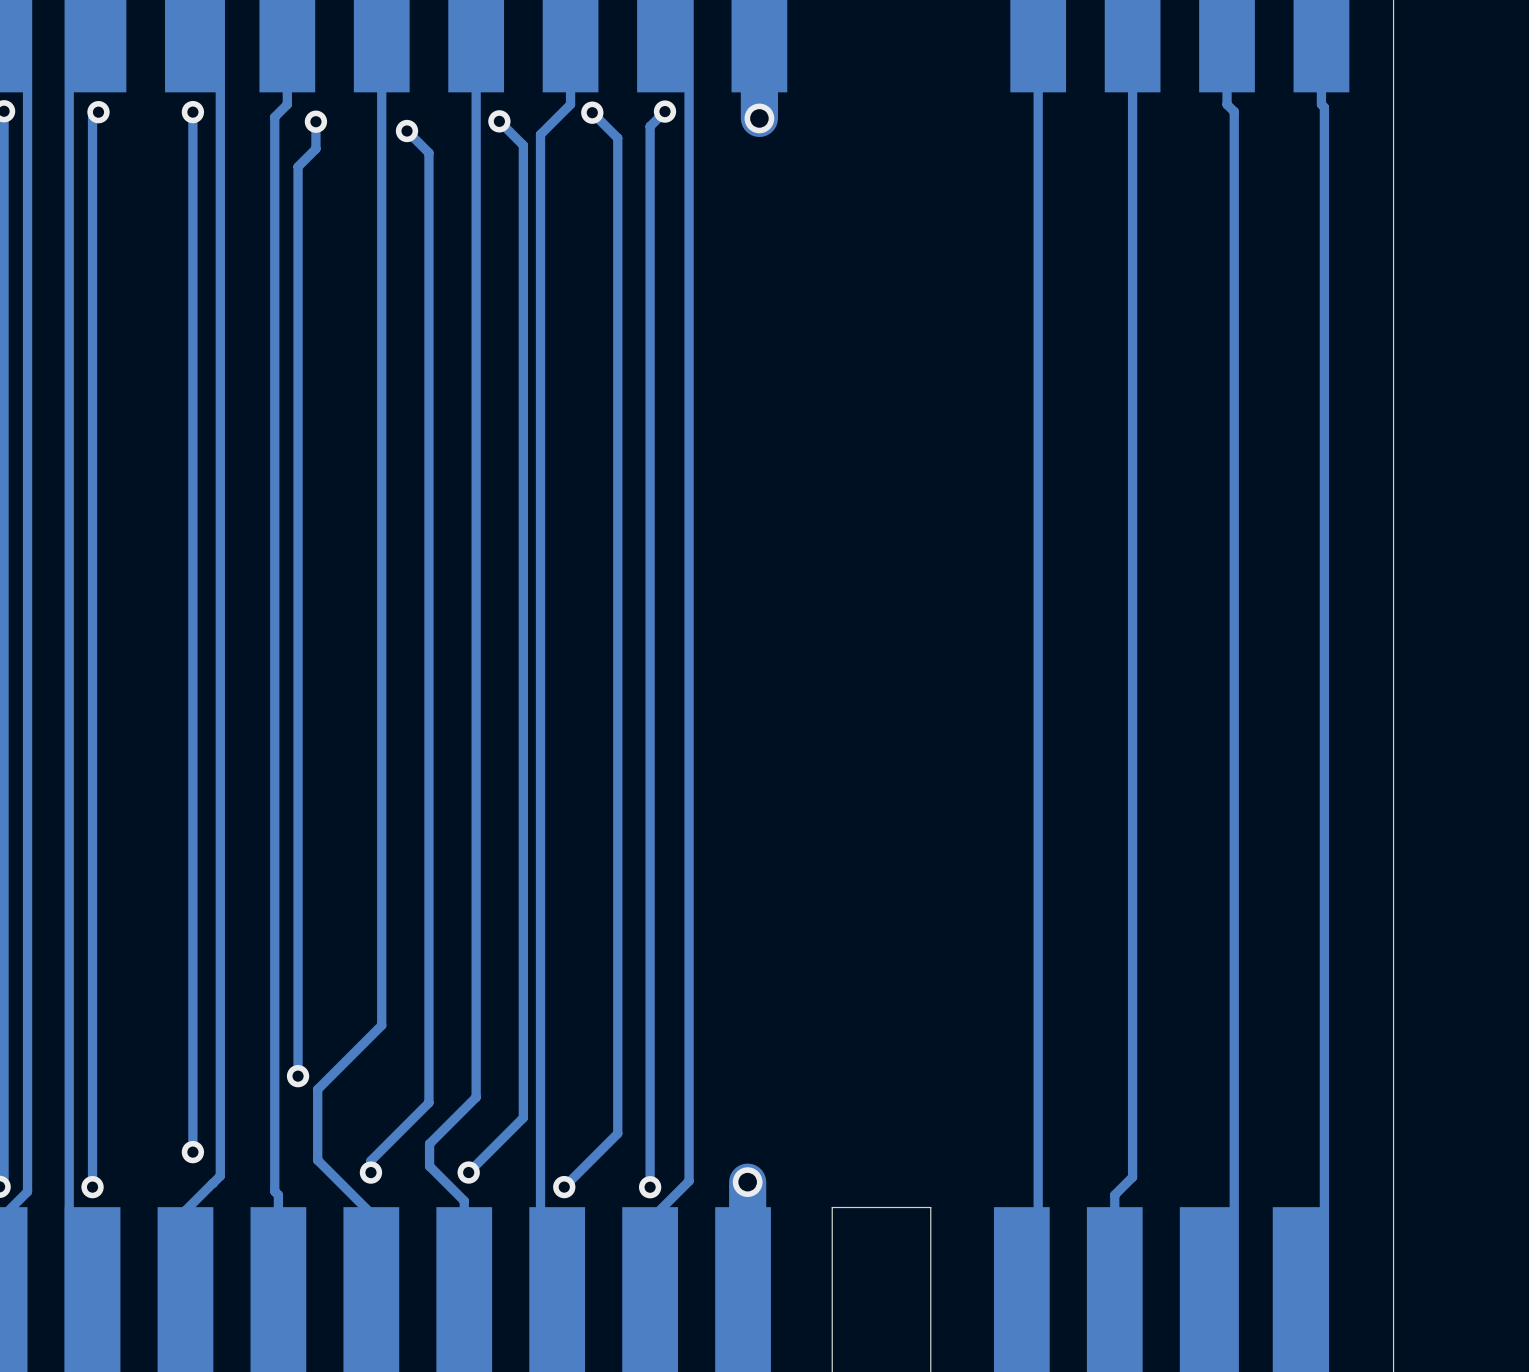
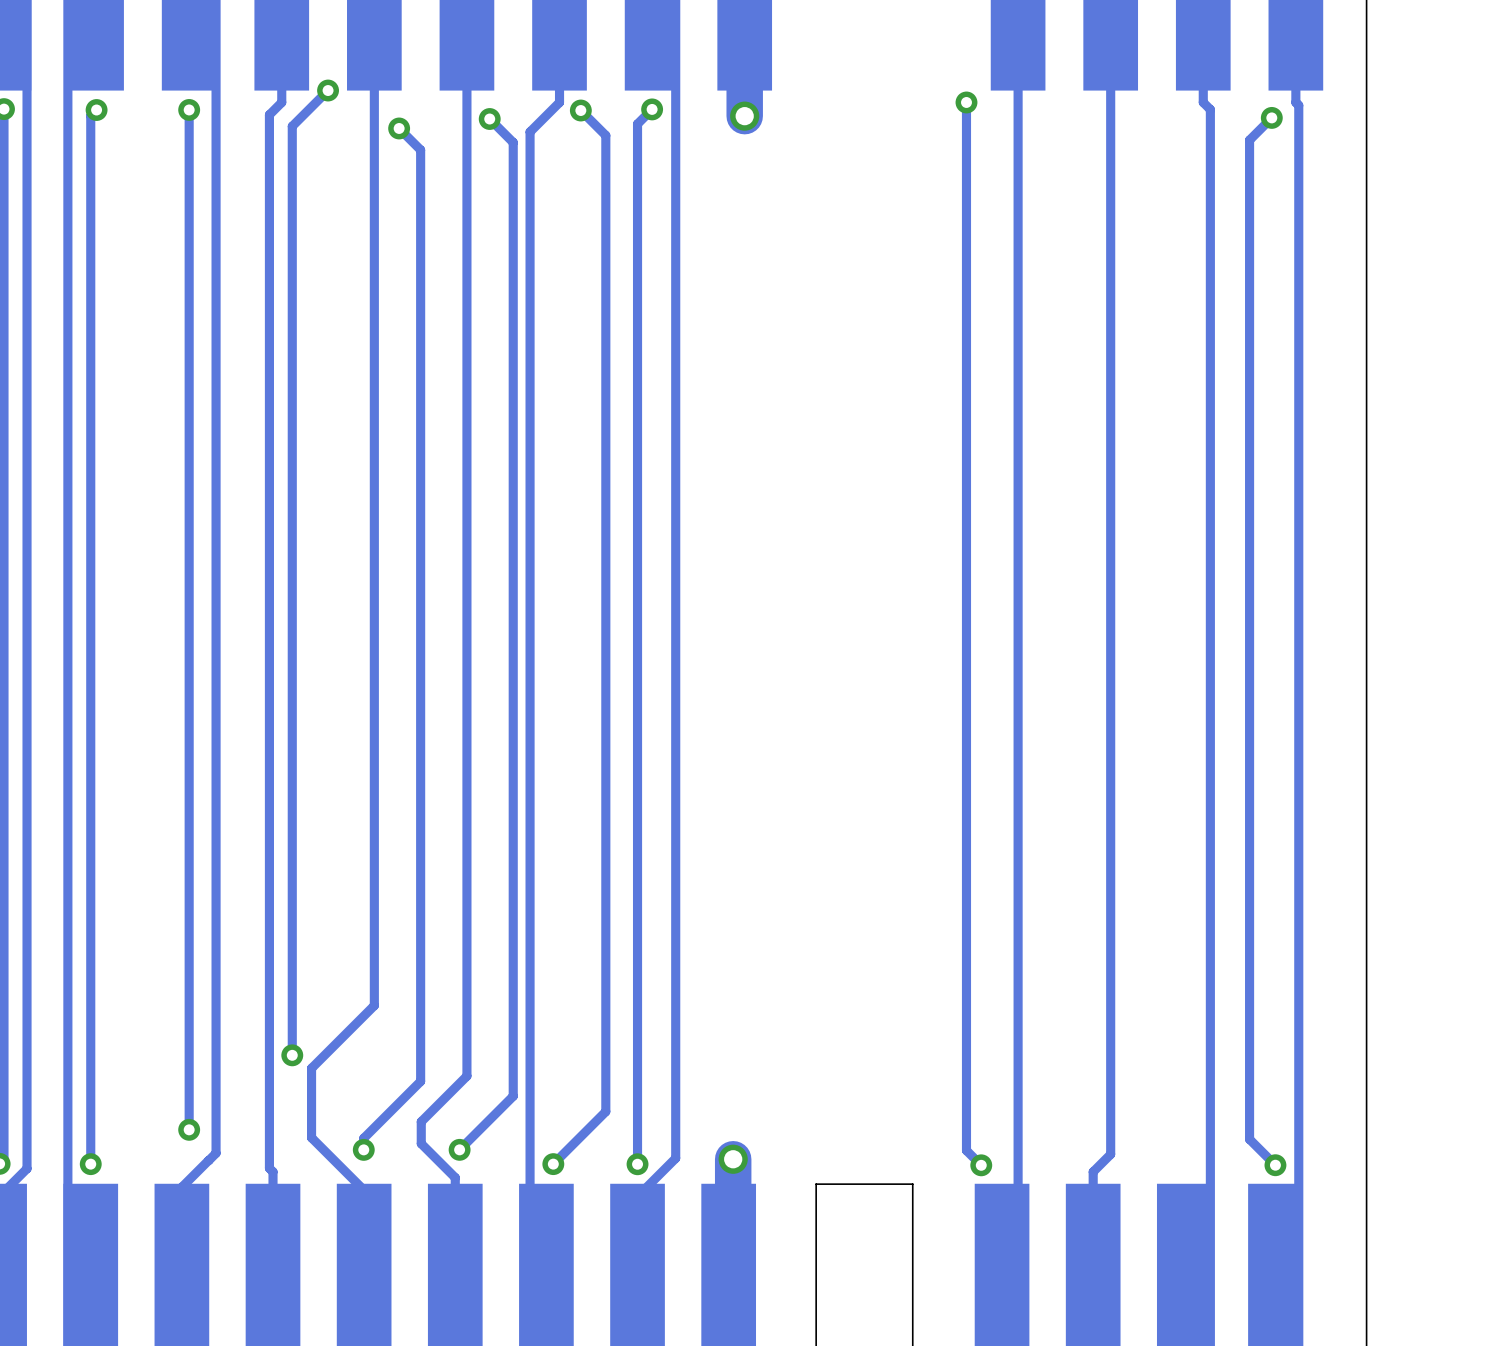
track: none -> (966, 102) (966, 1150) (981, 1165)
via: none -> (966, 102)
track: none -> (1271, 117) (1249, 140) (1249, 1139) (1275, 1165)
via: none -> (1271, 117)
track: (315, 121) (315, 148) (298, 166) -> (328, 90) (292, 126) (292, 163)
via position: (315, 121) -> (328, 90)
via: none -> (981, 1165)
via: none -> (1275, 1165)

